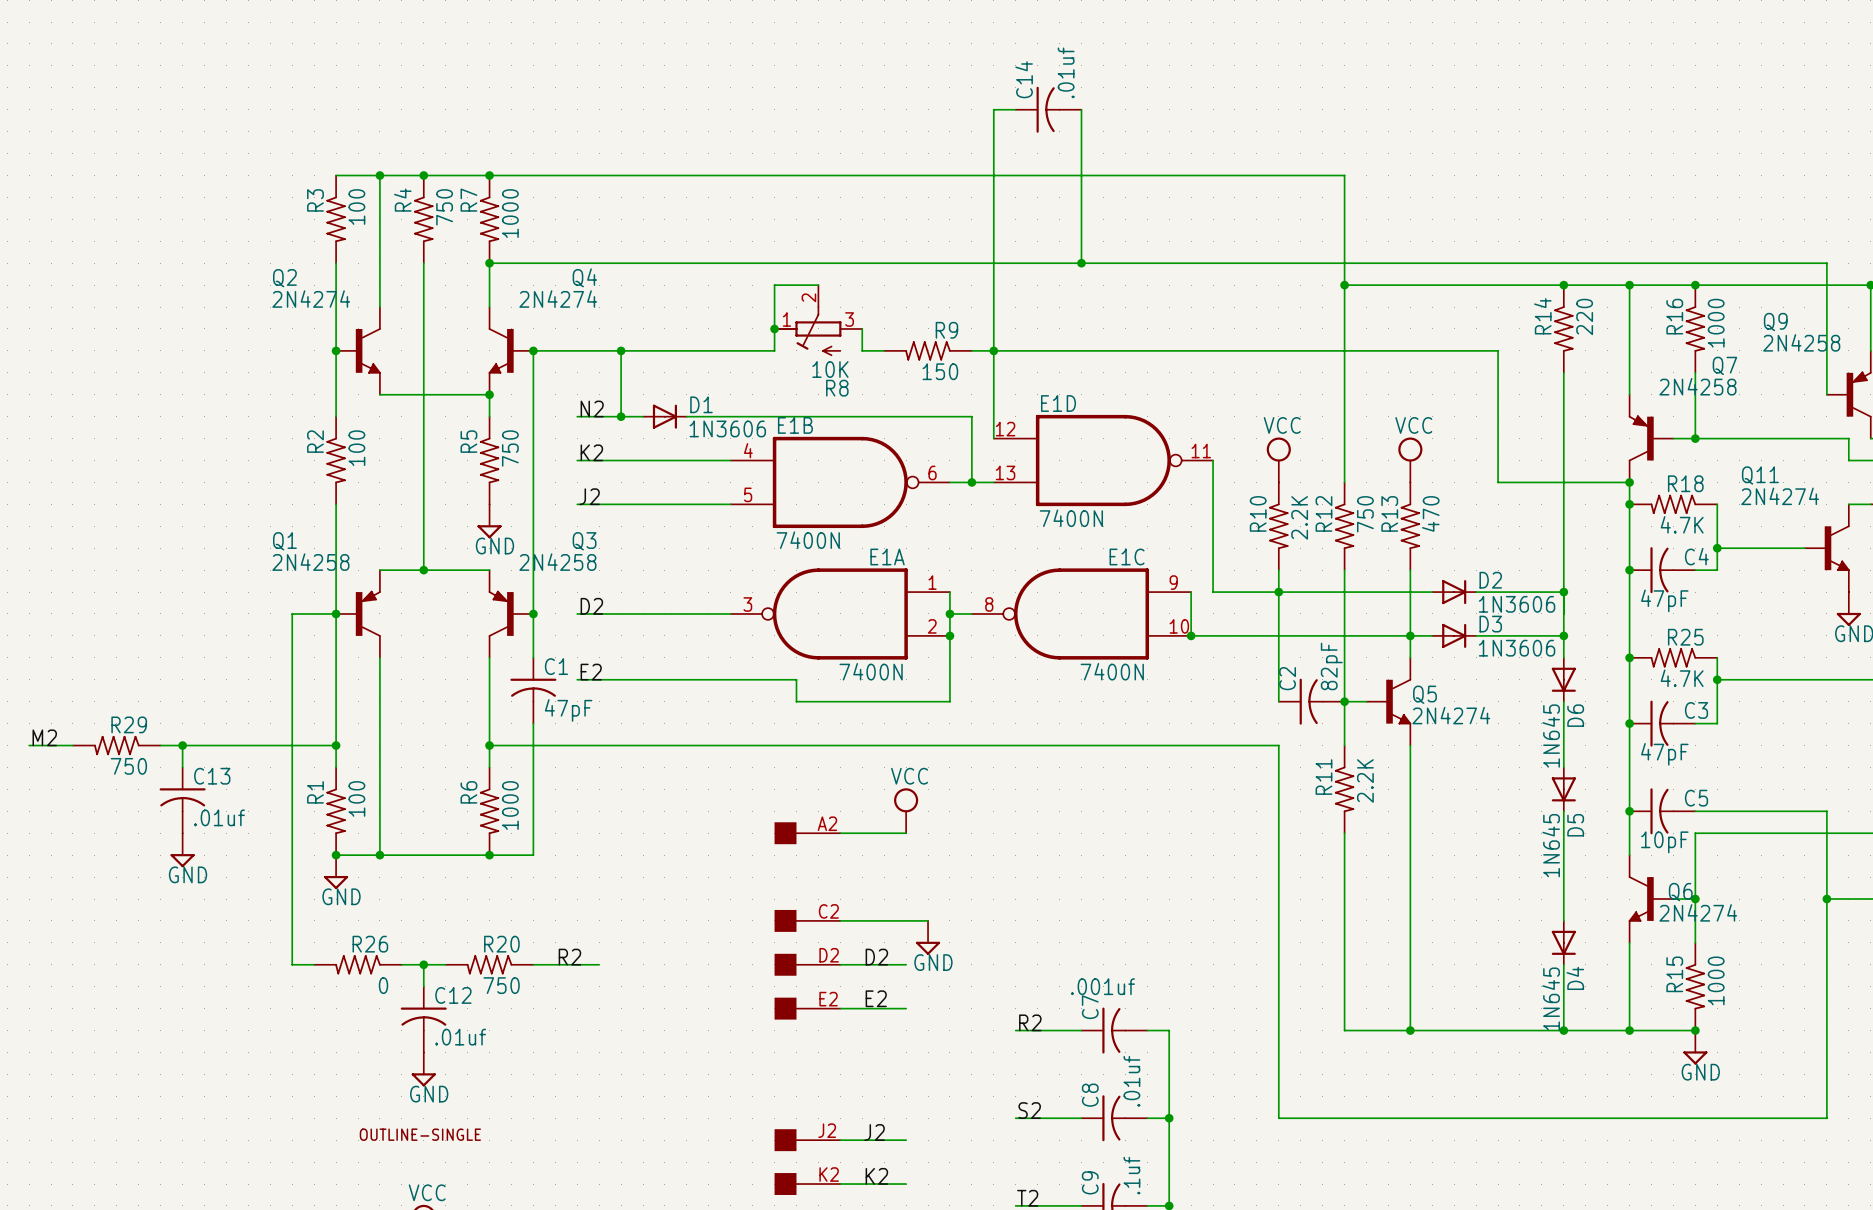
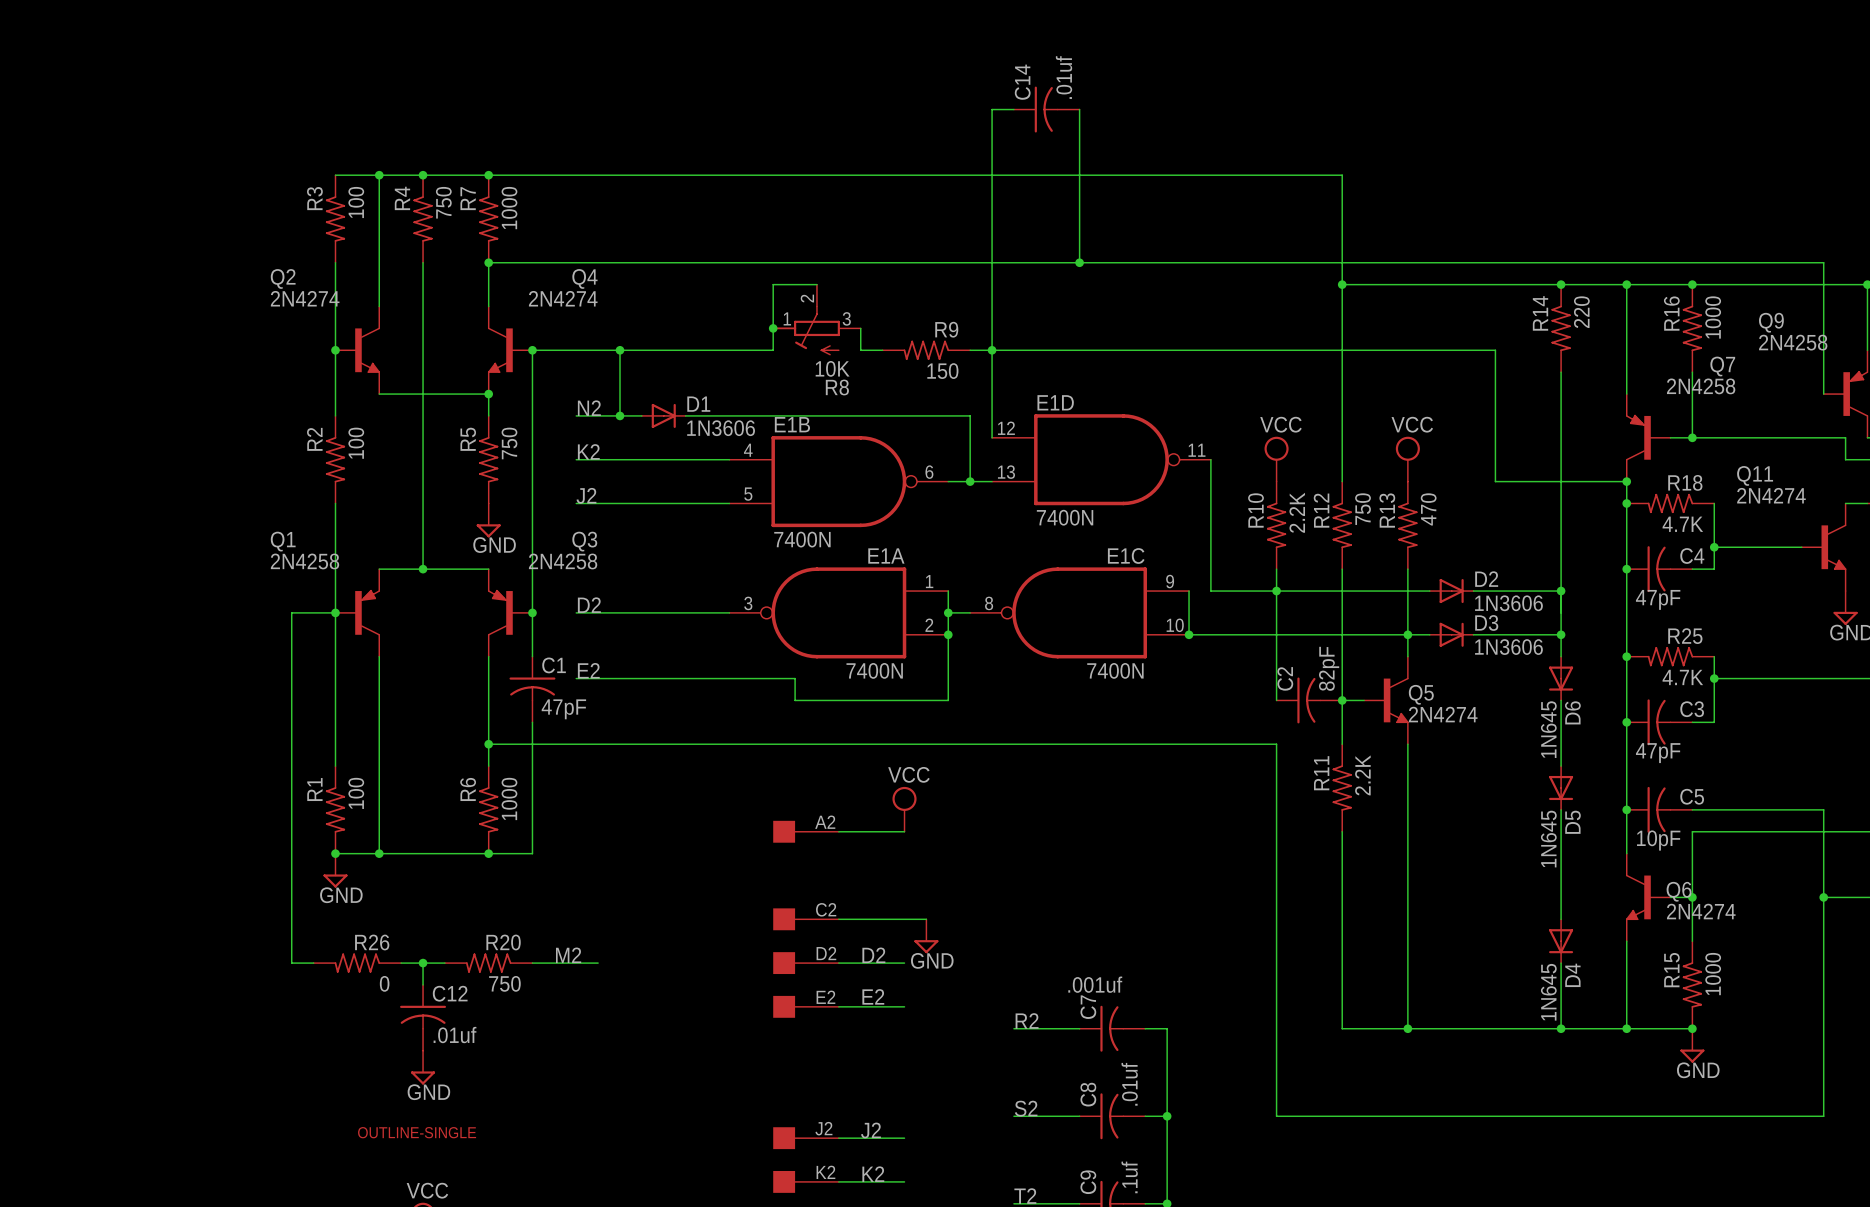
label: M2 (44, 737) -> none
wire: (29, 745) (72, 745) -> none
R29: 750 (116, 745) -> none
wire: (160, 745) (336, 745) -> none
wire: (182, 745) (182, 767) -> none
junction: (182, 745) -> none
junction: (336, 745) -> none
C13: .01uf (182, 800) -> none
power symbol: GND (182, 850) -> none
label: R2 (569, 957) -> M2 (568, 955)

